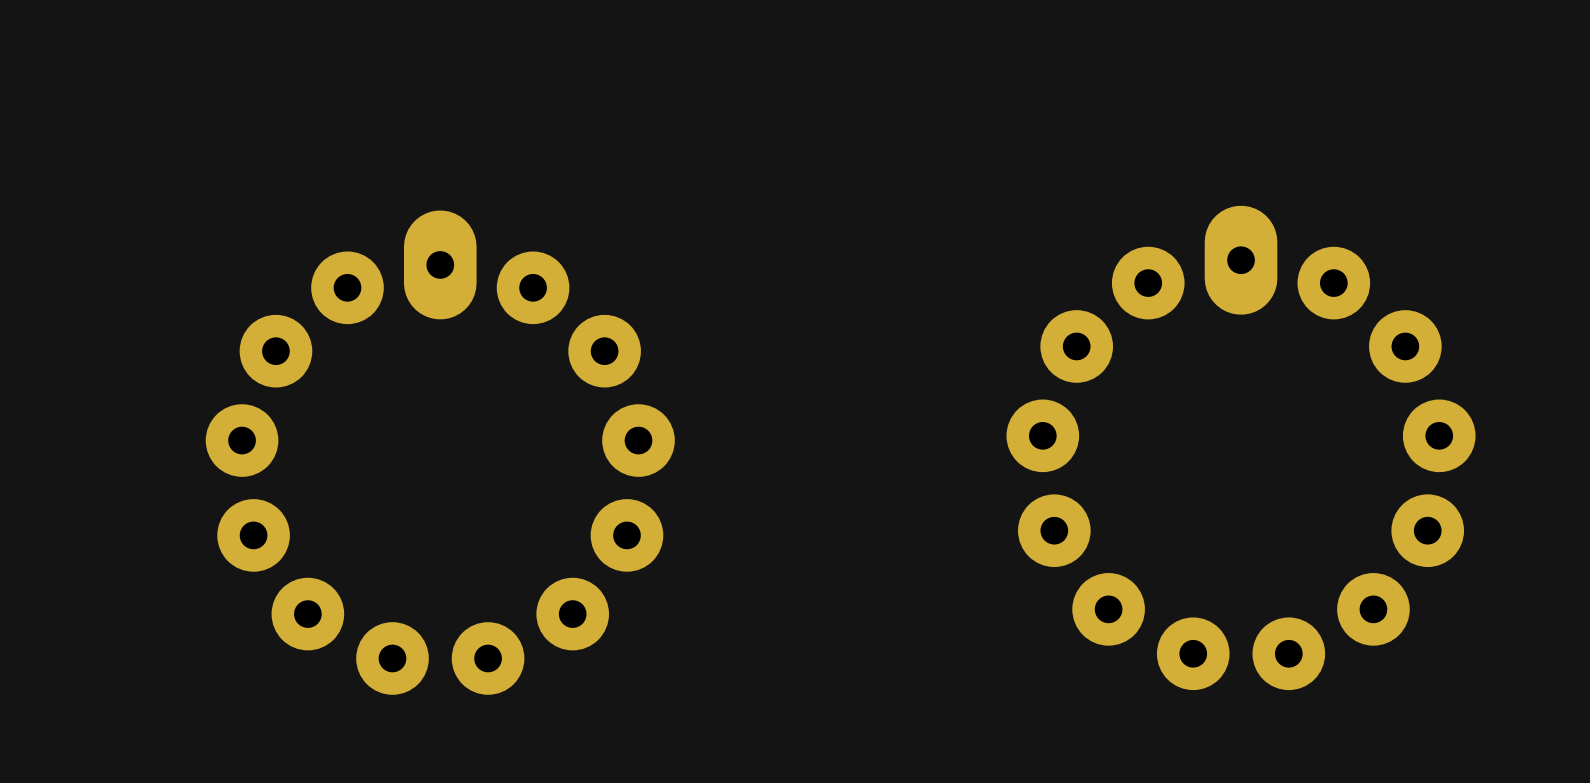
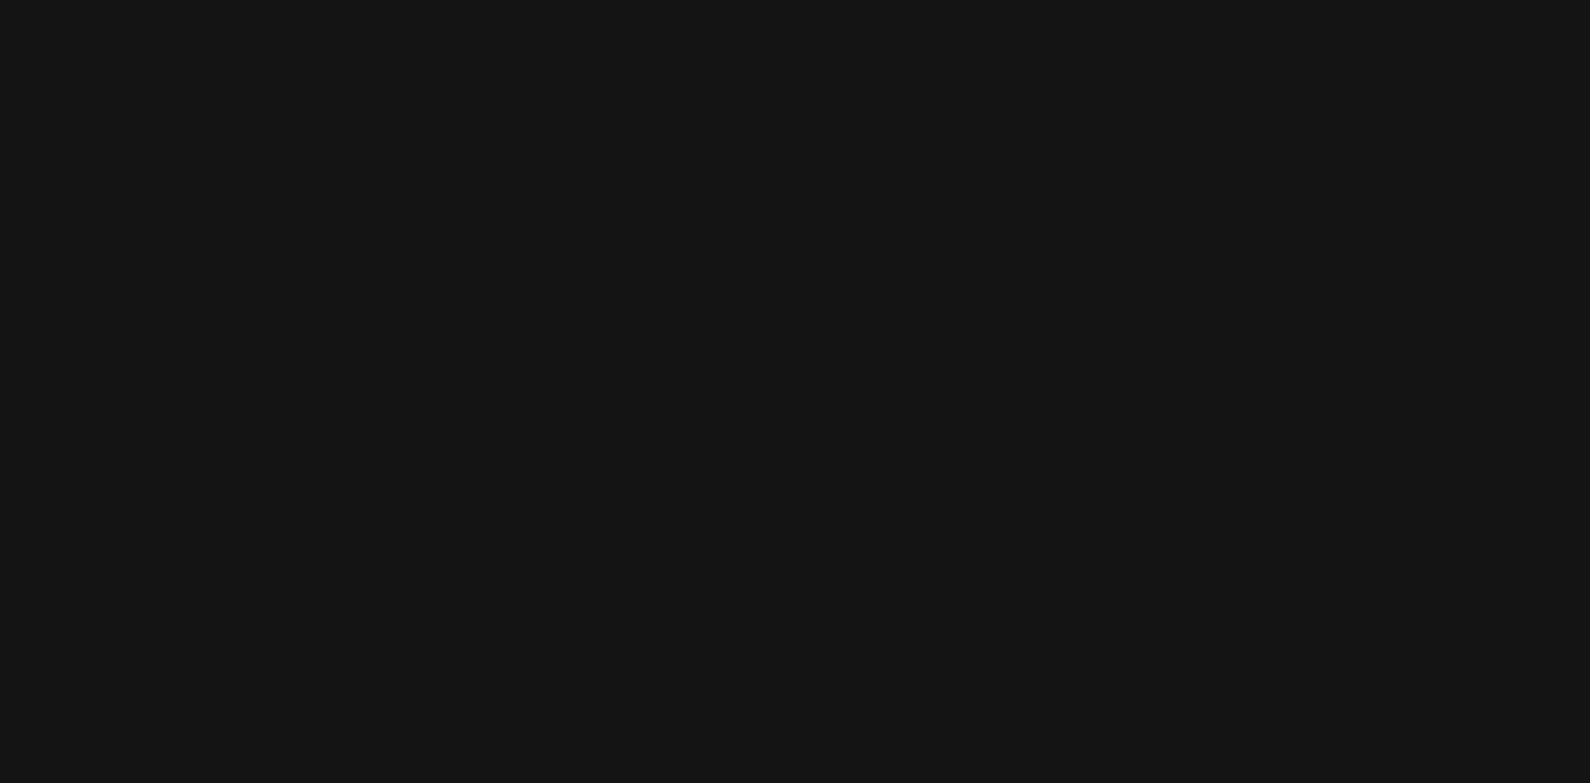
part: (1241, 447) -> none
part: (440, 452) -> none

